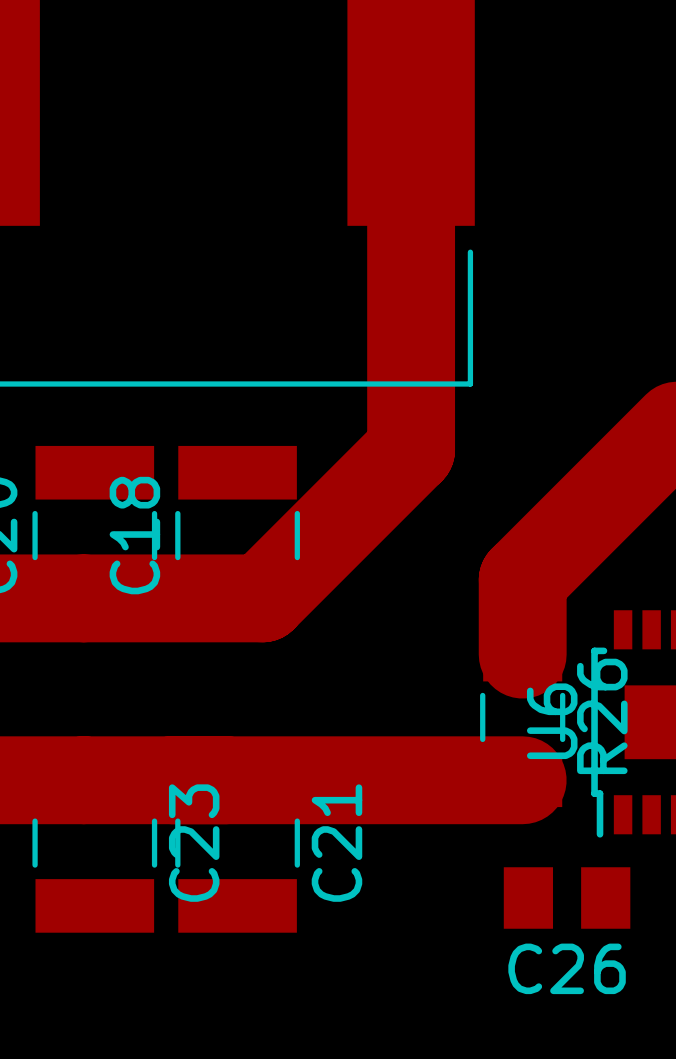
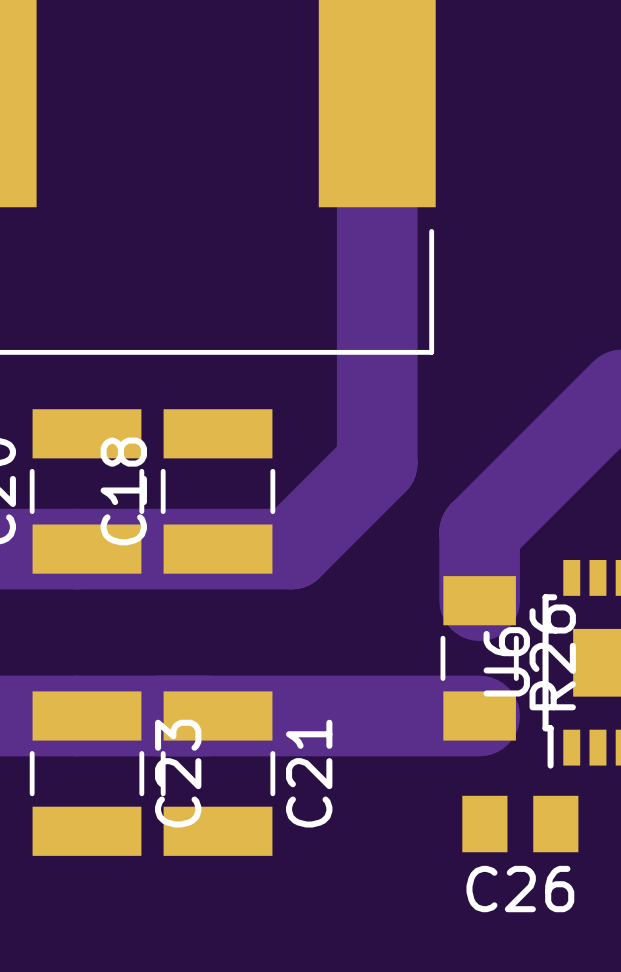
track: (411, 449) (262, 598) -> (377, 412) (377, 463) (291, 549) (240, 549)

